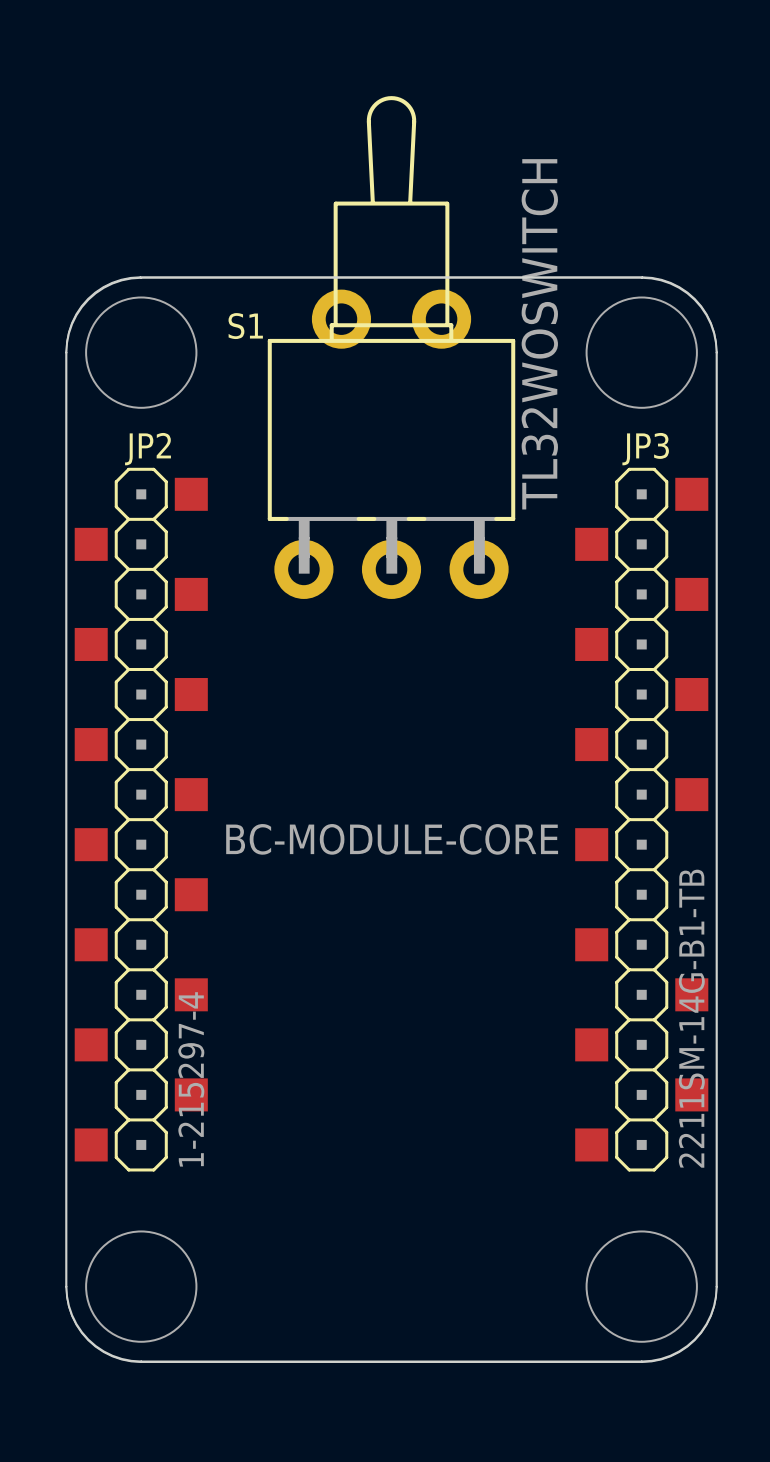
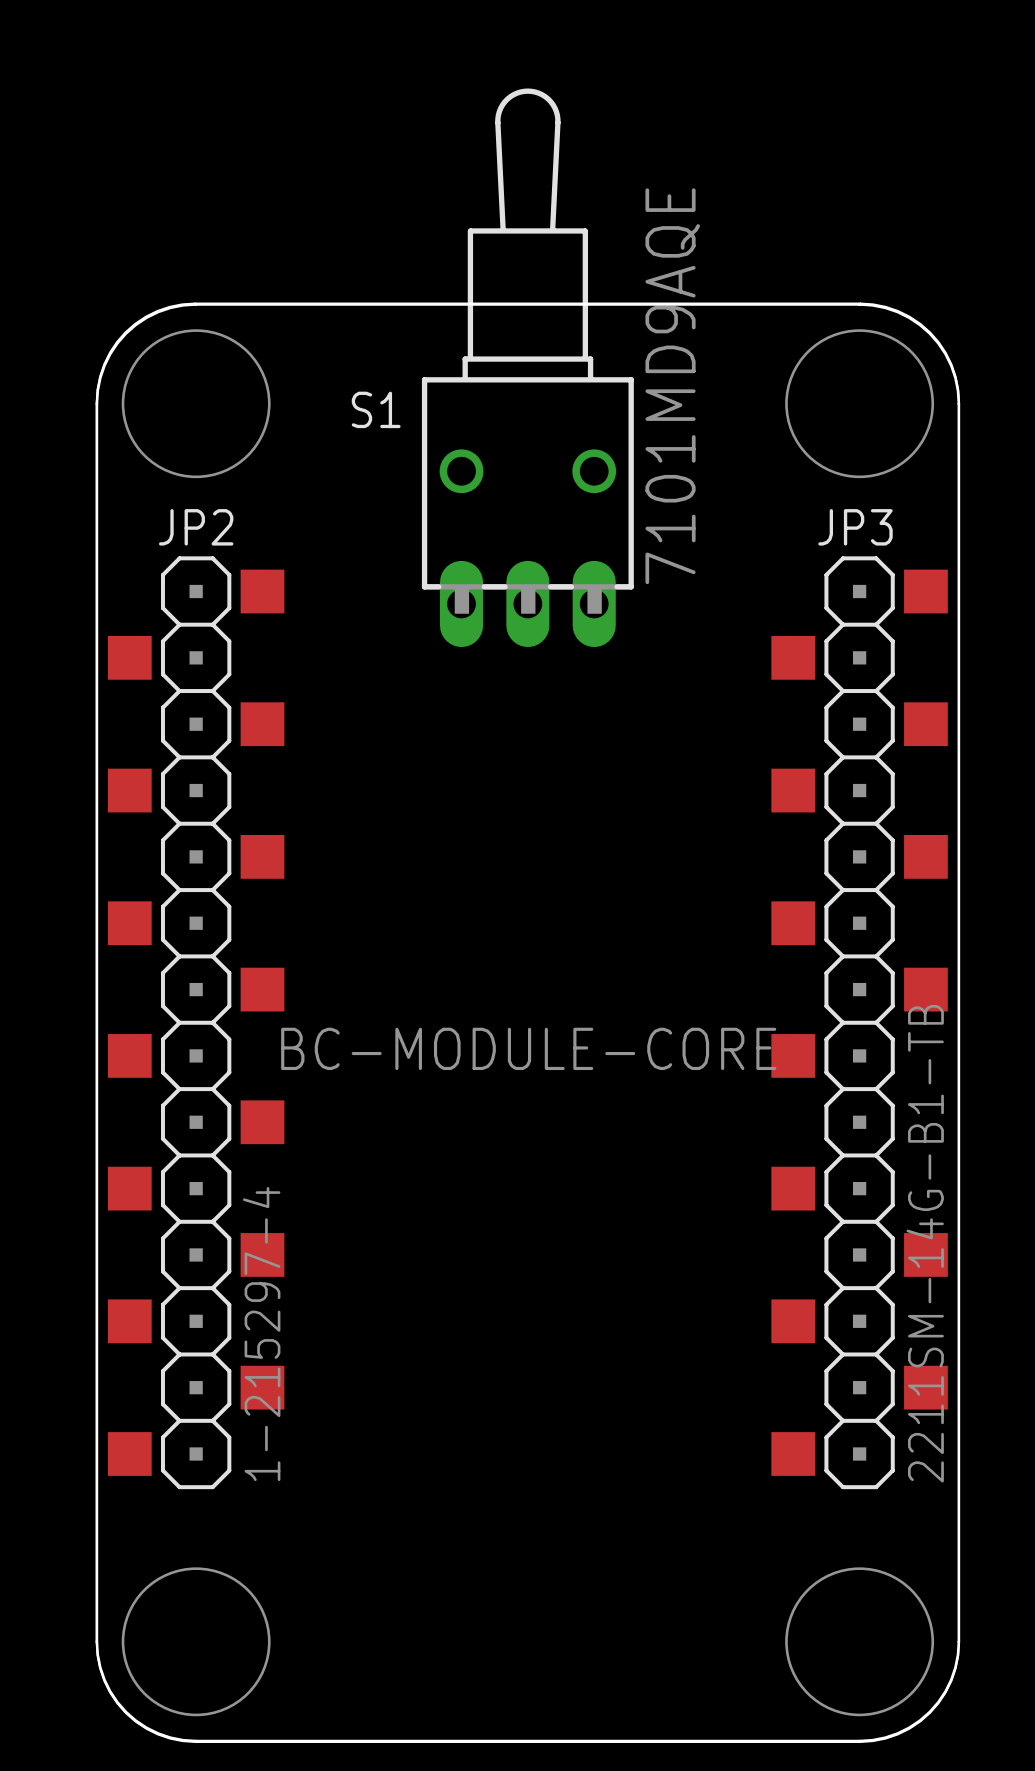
S1 footprint: [267, 96, 516, 599] -> [421, 88, 634, 648]
S1 name position: S1 (245, 326) -> S1 (376, 409)
S1 value: TL32WOSWITCH (539, 334) -> 7101MD9AQE (672, 386)

